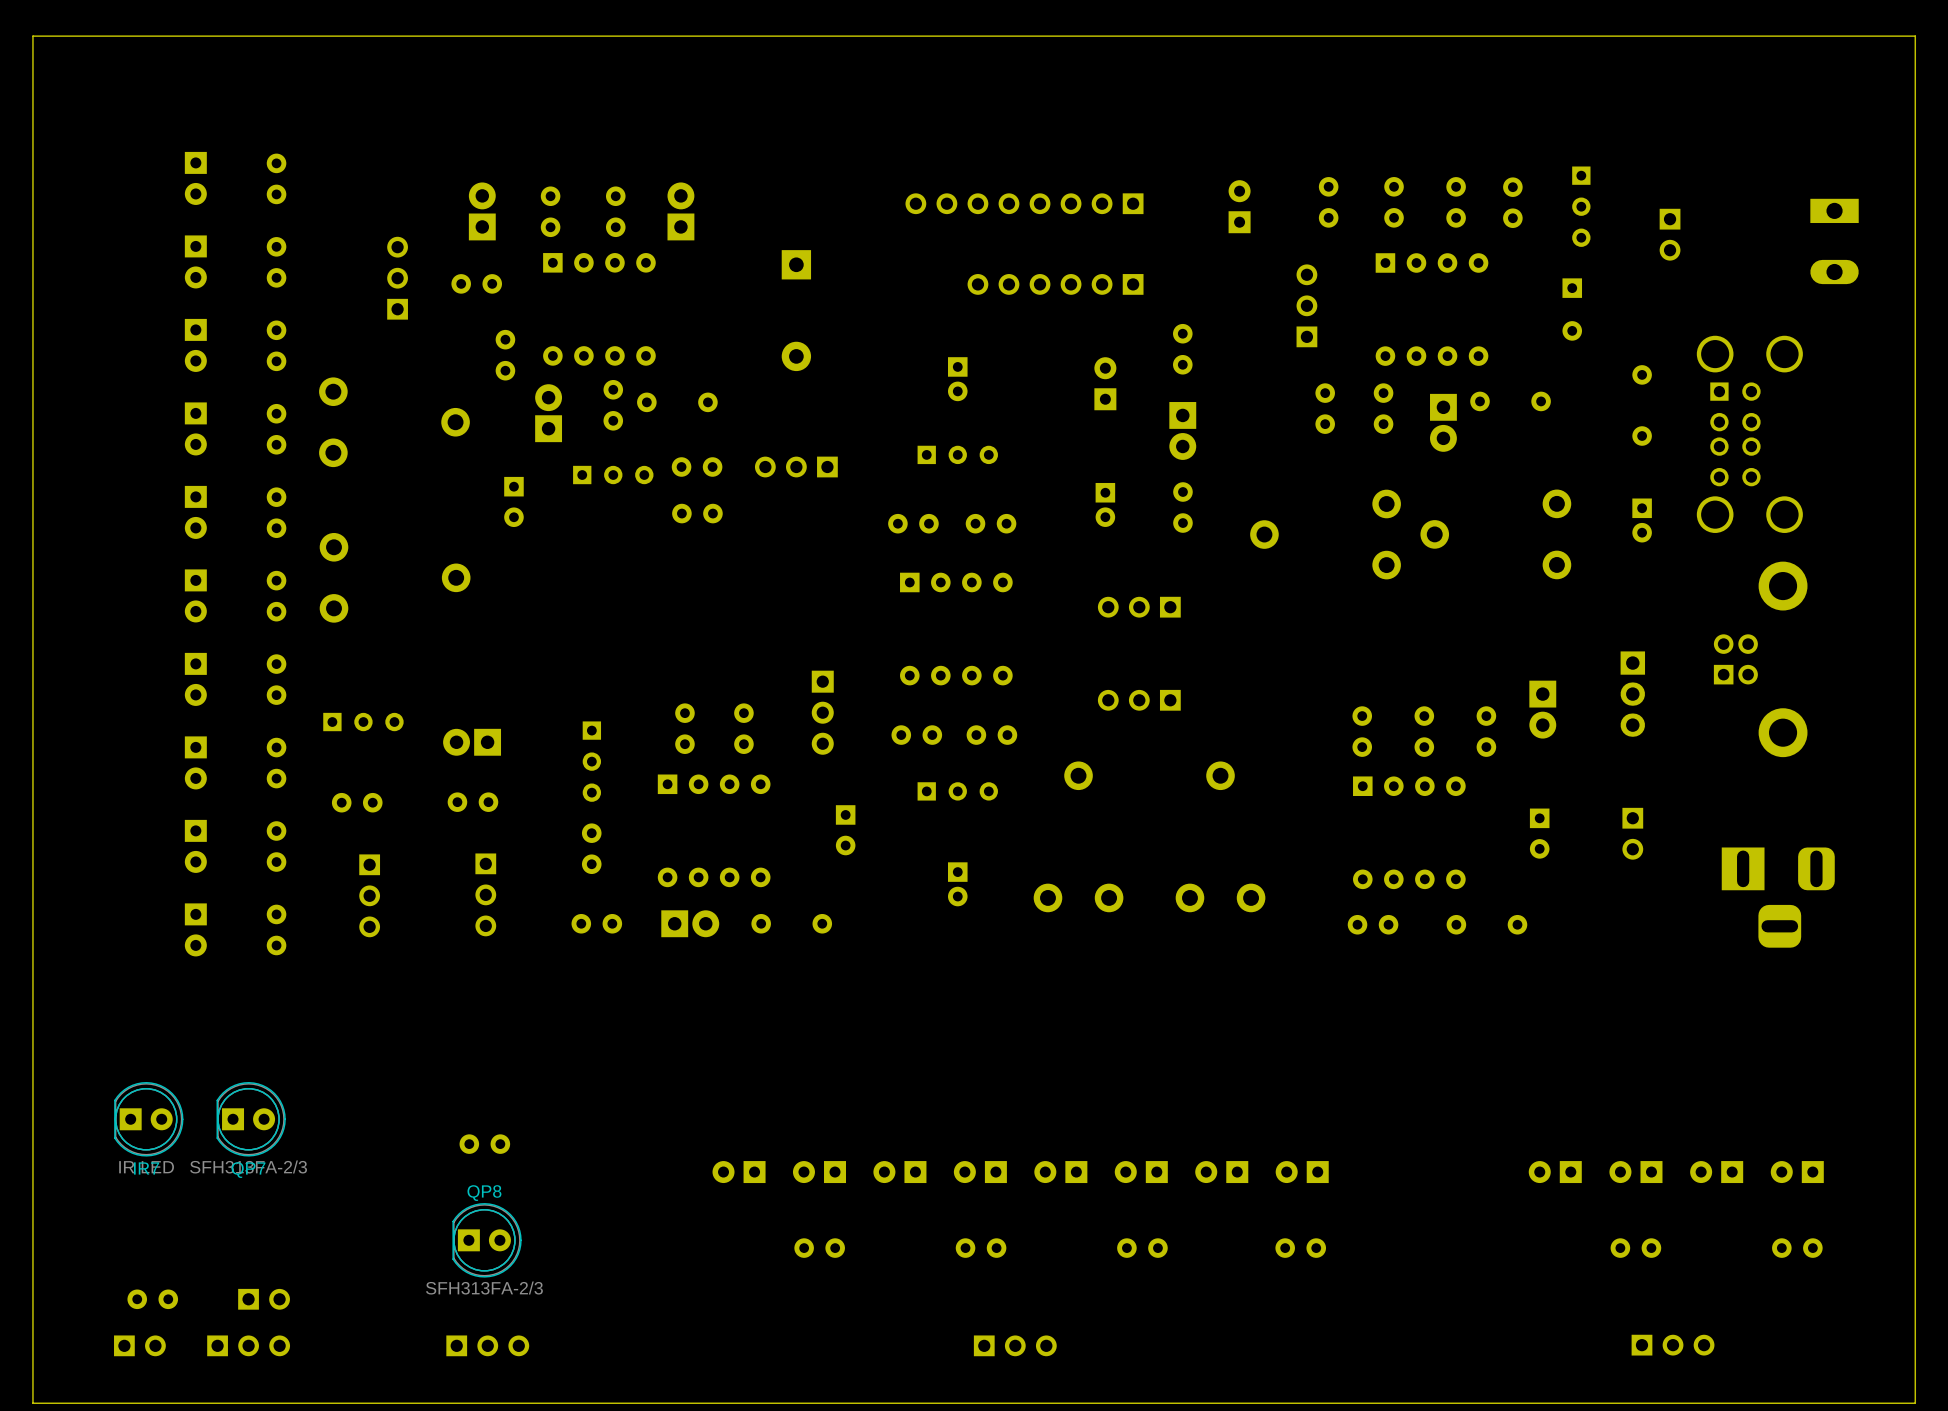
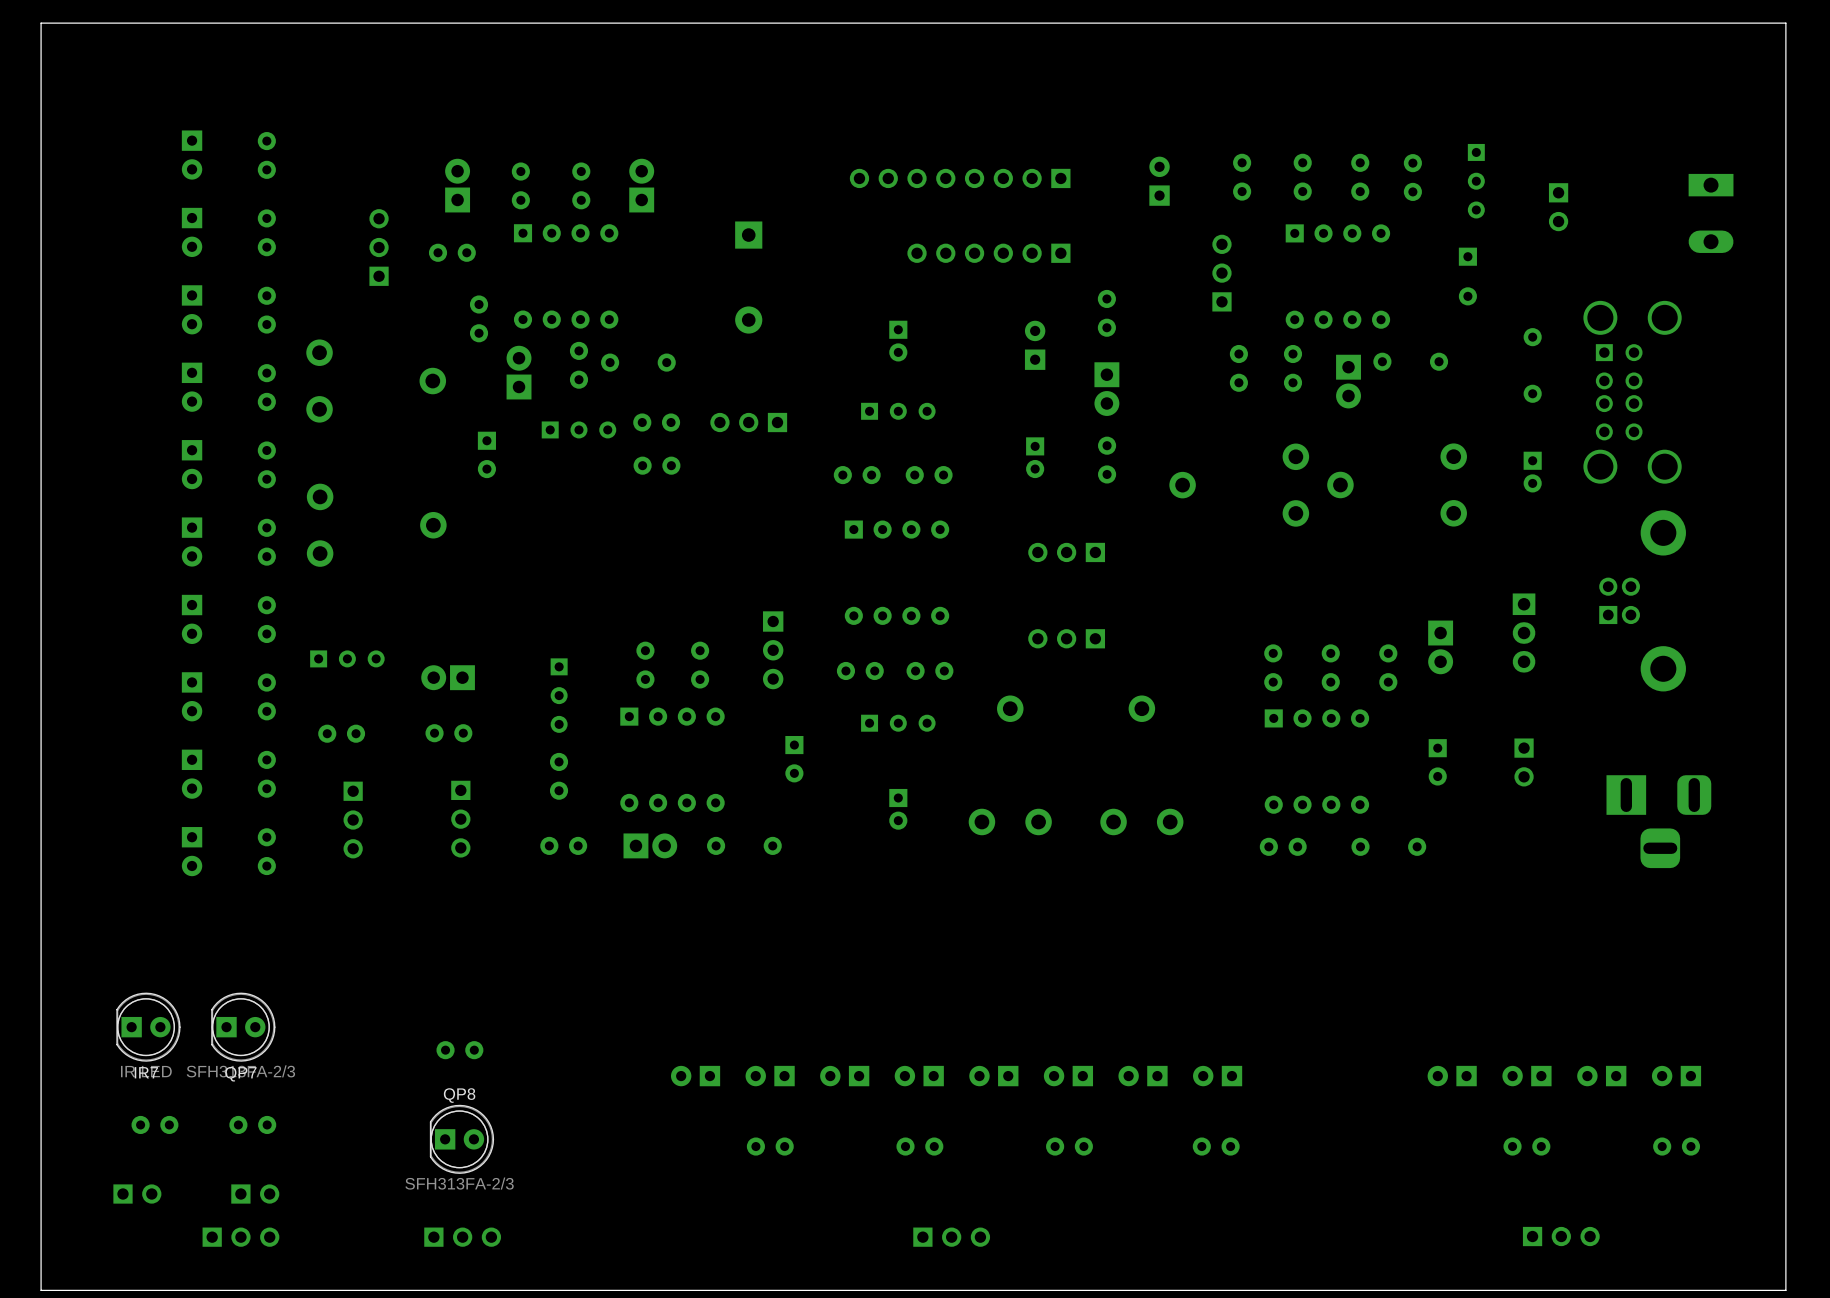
part: none -> (154, 1124)
part: none -> (252, 1124)
part: (152, 1299) -> none
part position: (139, 1345) -> (137, 1194)

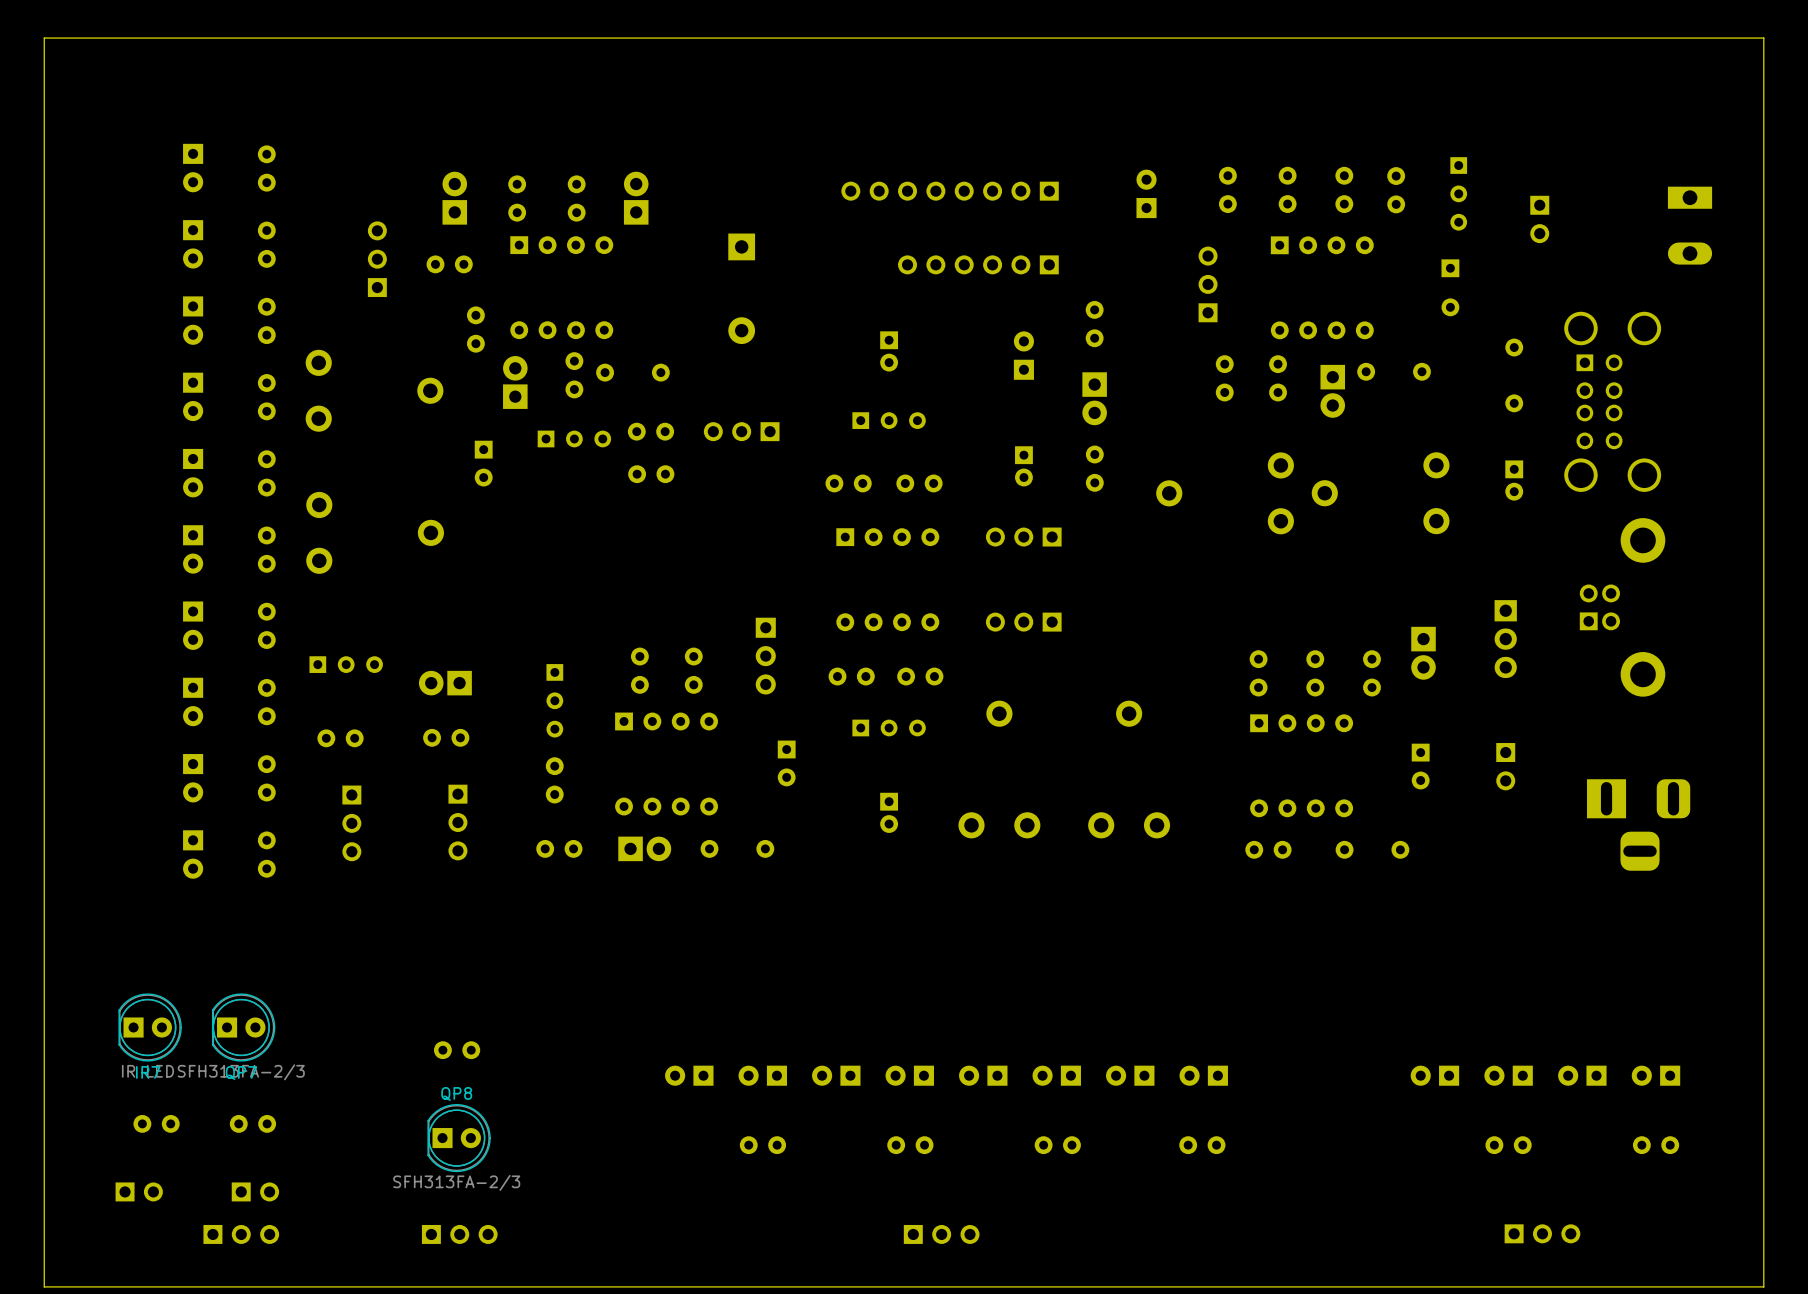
part: none -> (1023, 537)
part: (1066, 552) -> none
part: none -> (1023, 622)
part: (1066, 638) -> none

